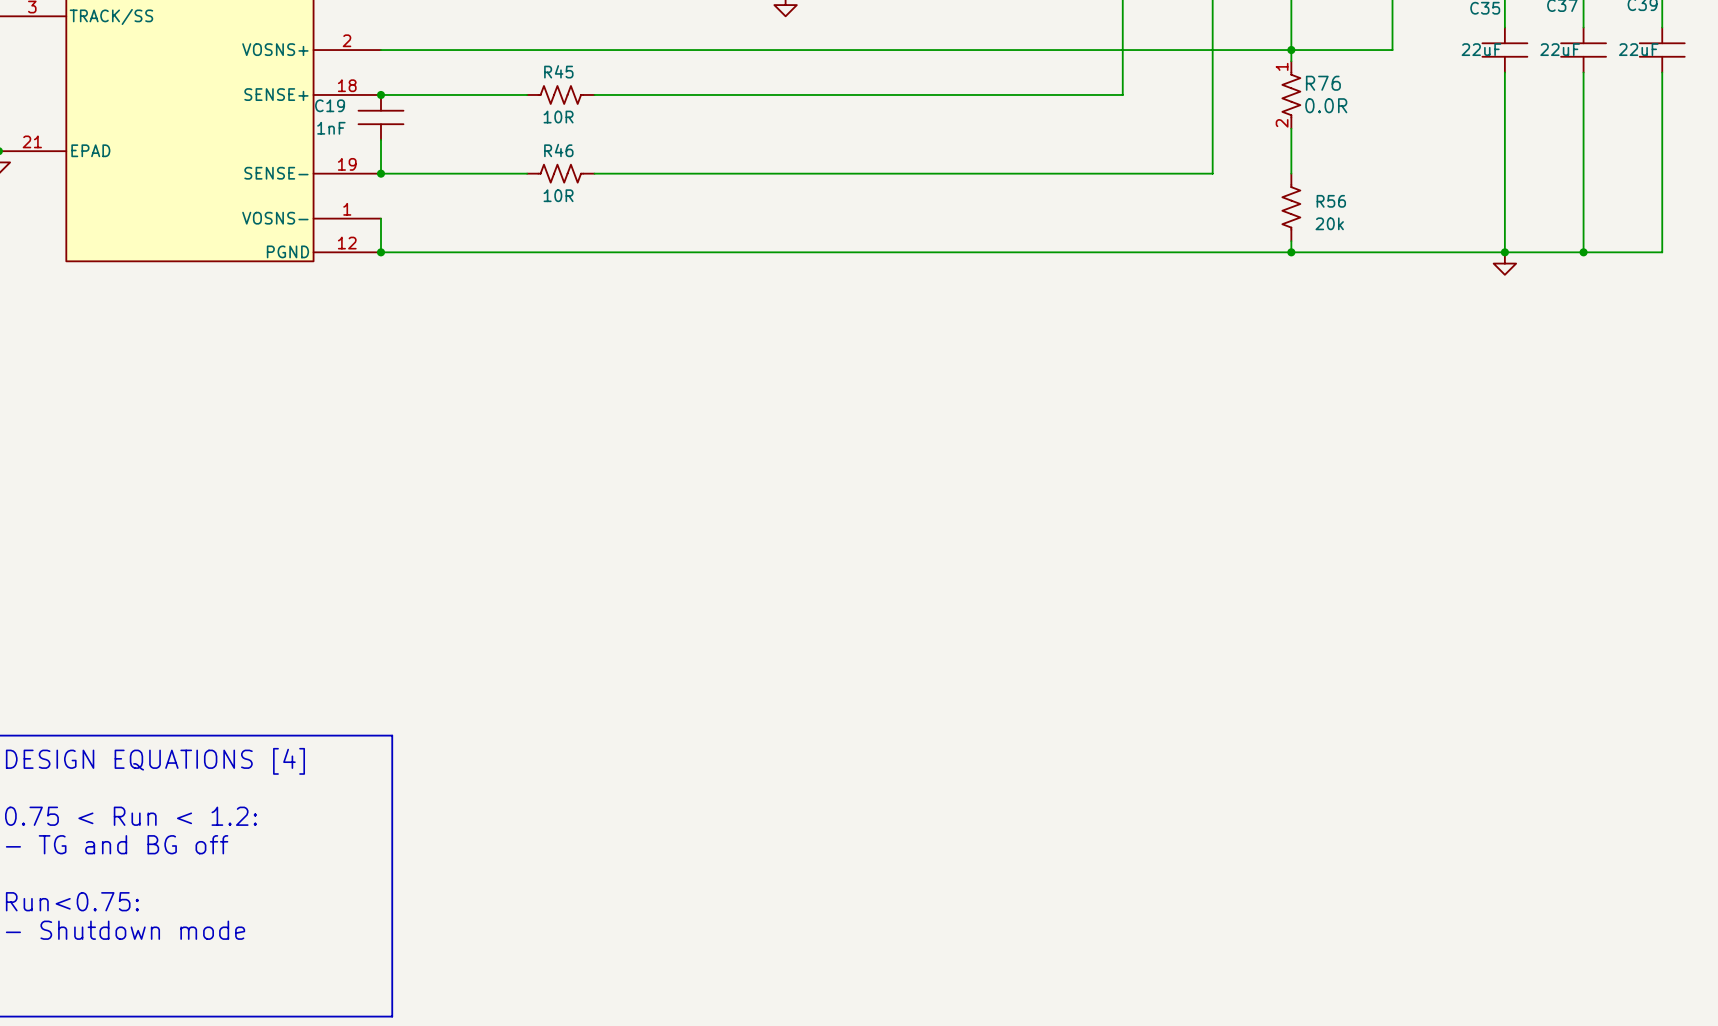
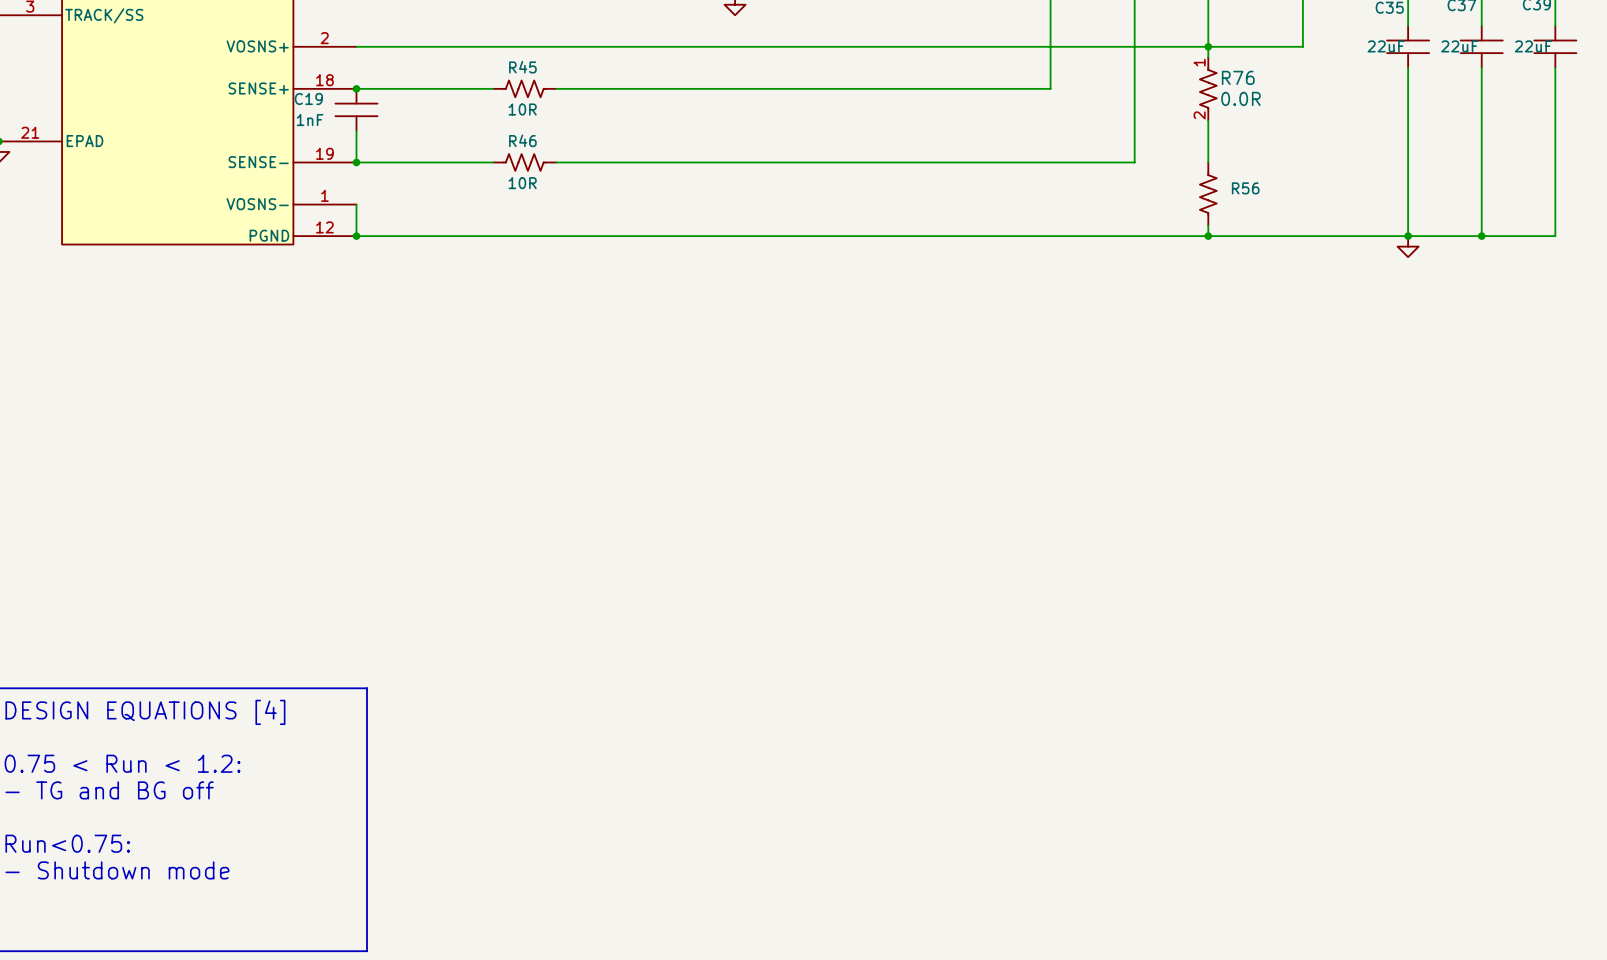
R56 value: 20k (1329, 223) -> none

